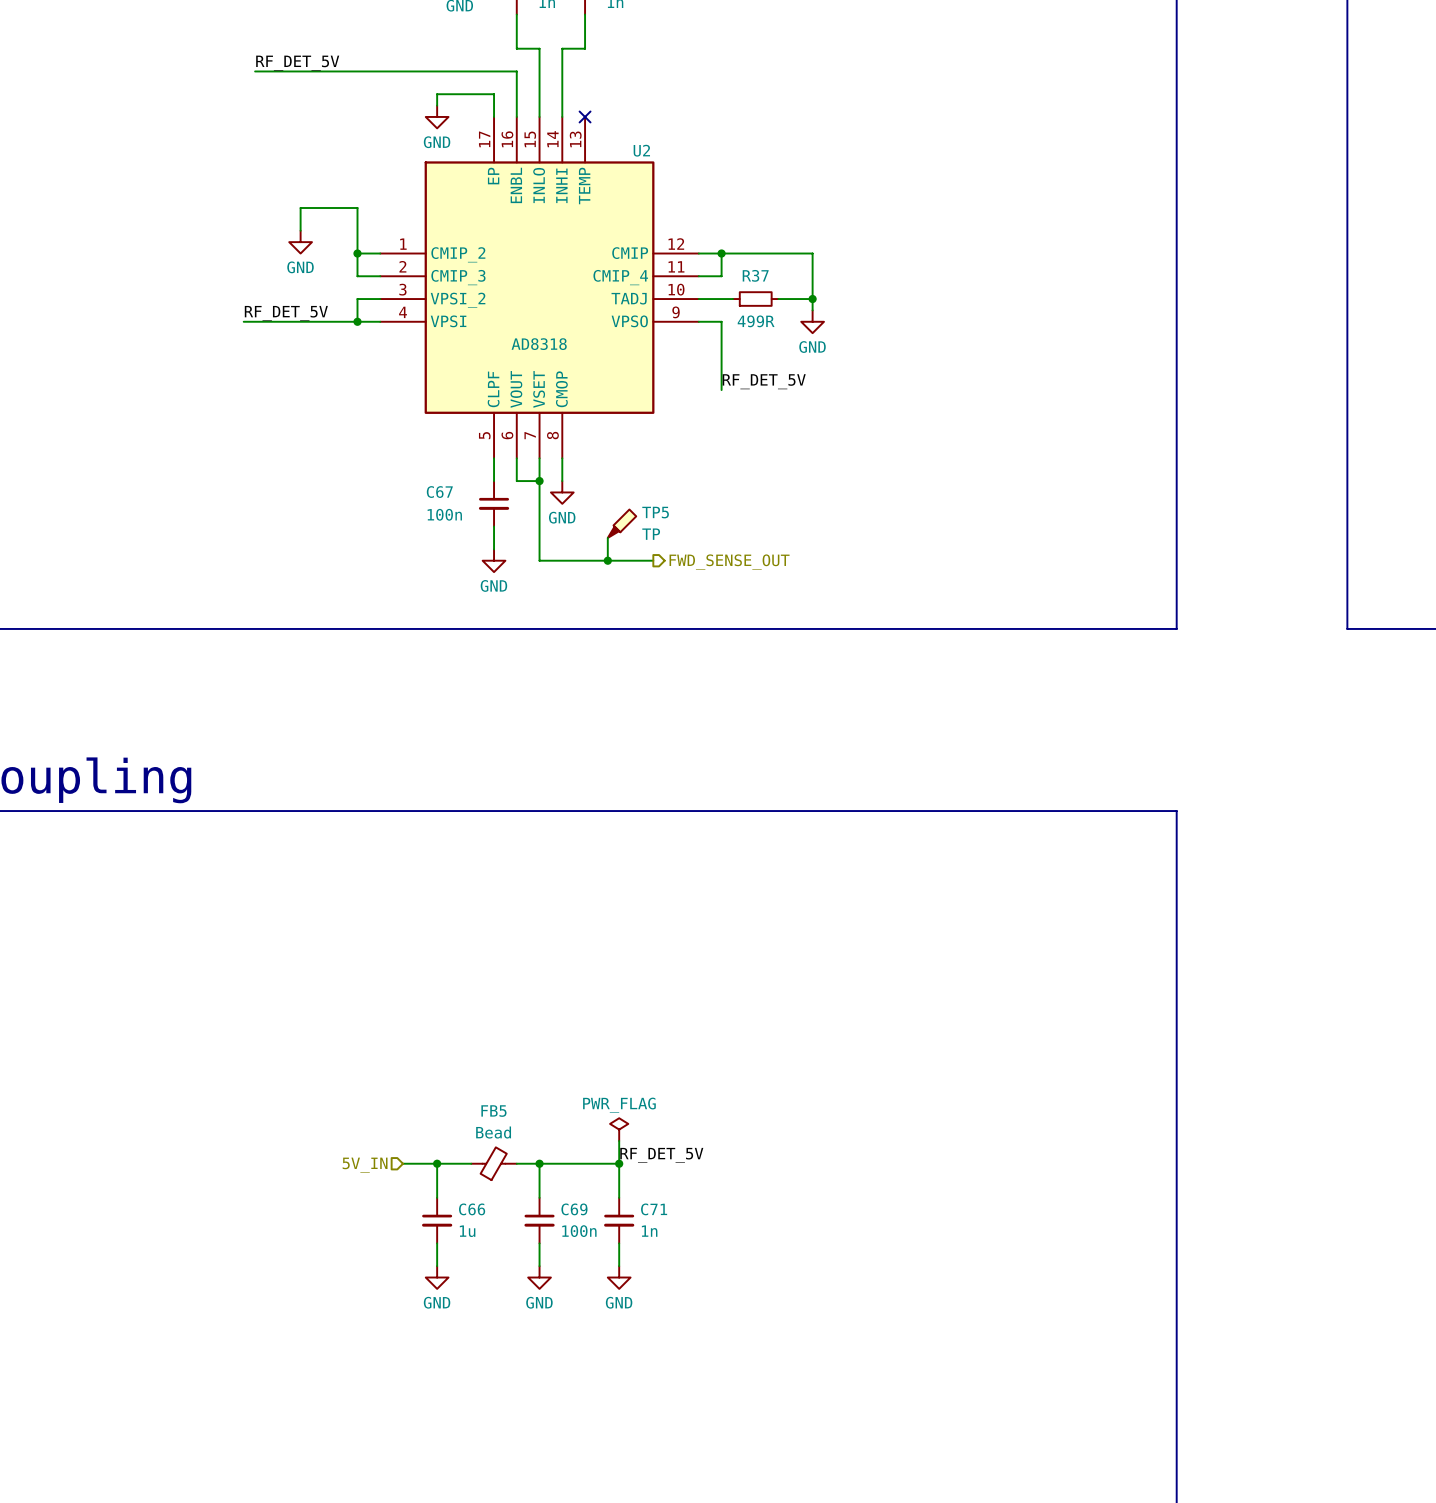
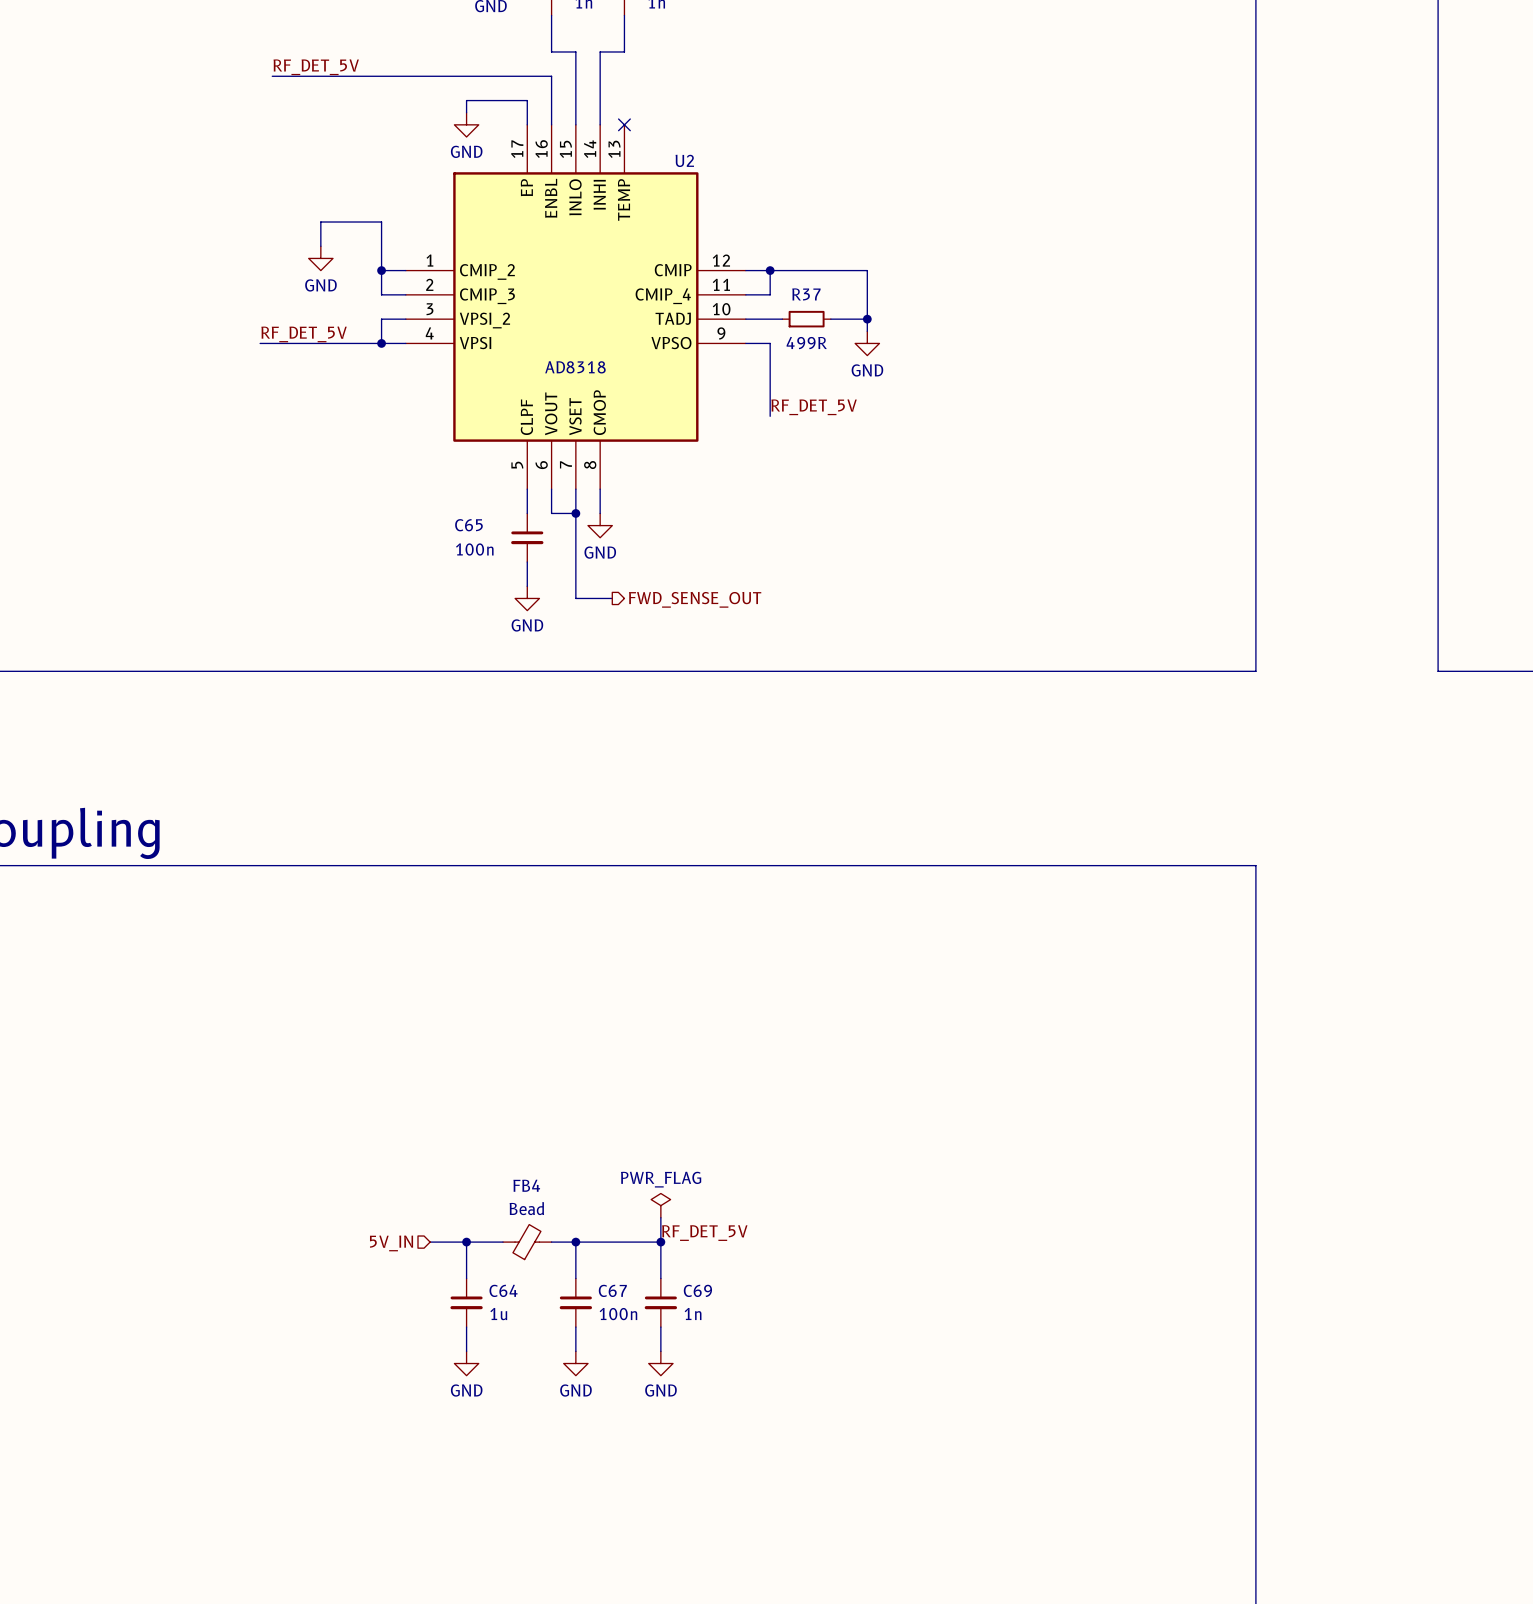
C67 name: C67 (439, 492) -> C65 (468, 525)
TP5: TP (622, 523) -> none
wire: (607, 537) (607, 560) -> none
wire: (573, 560) (653, 560) -> none
junction: (607, 560) -> none
hierarchical label position: FWD_SENSE_OUT (729, 562) -> FWD_SENSE_OUT (695, 599)
FB5 name: FB5 (493, 1111) -> FB4 (526, 1185)
C66 name: C66 (472, 1209) -> C64 (503, 1290)
C69 name: C69 (574, 1209) -> C67 (612, 1290)
C71 name: C71 (654, 1209) -> C69 (697, 1290)

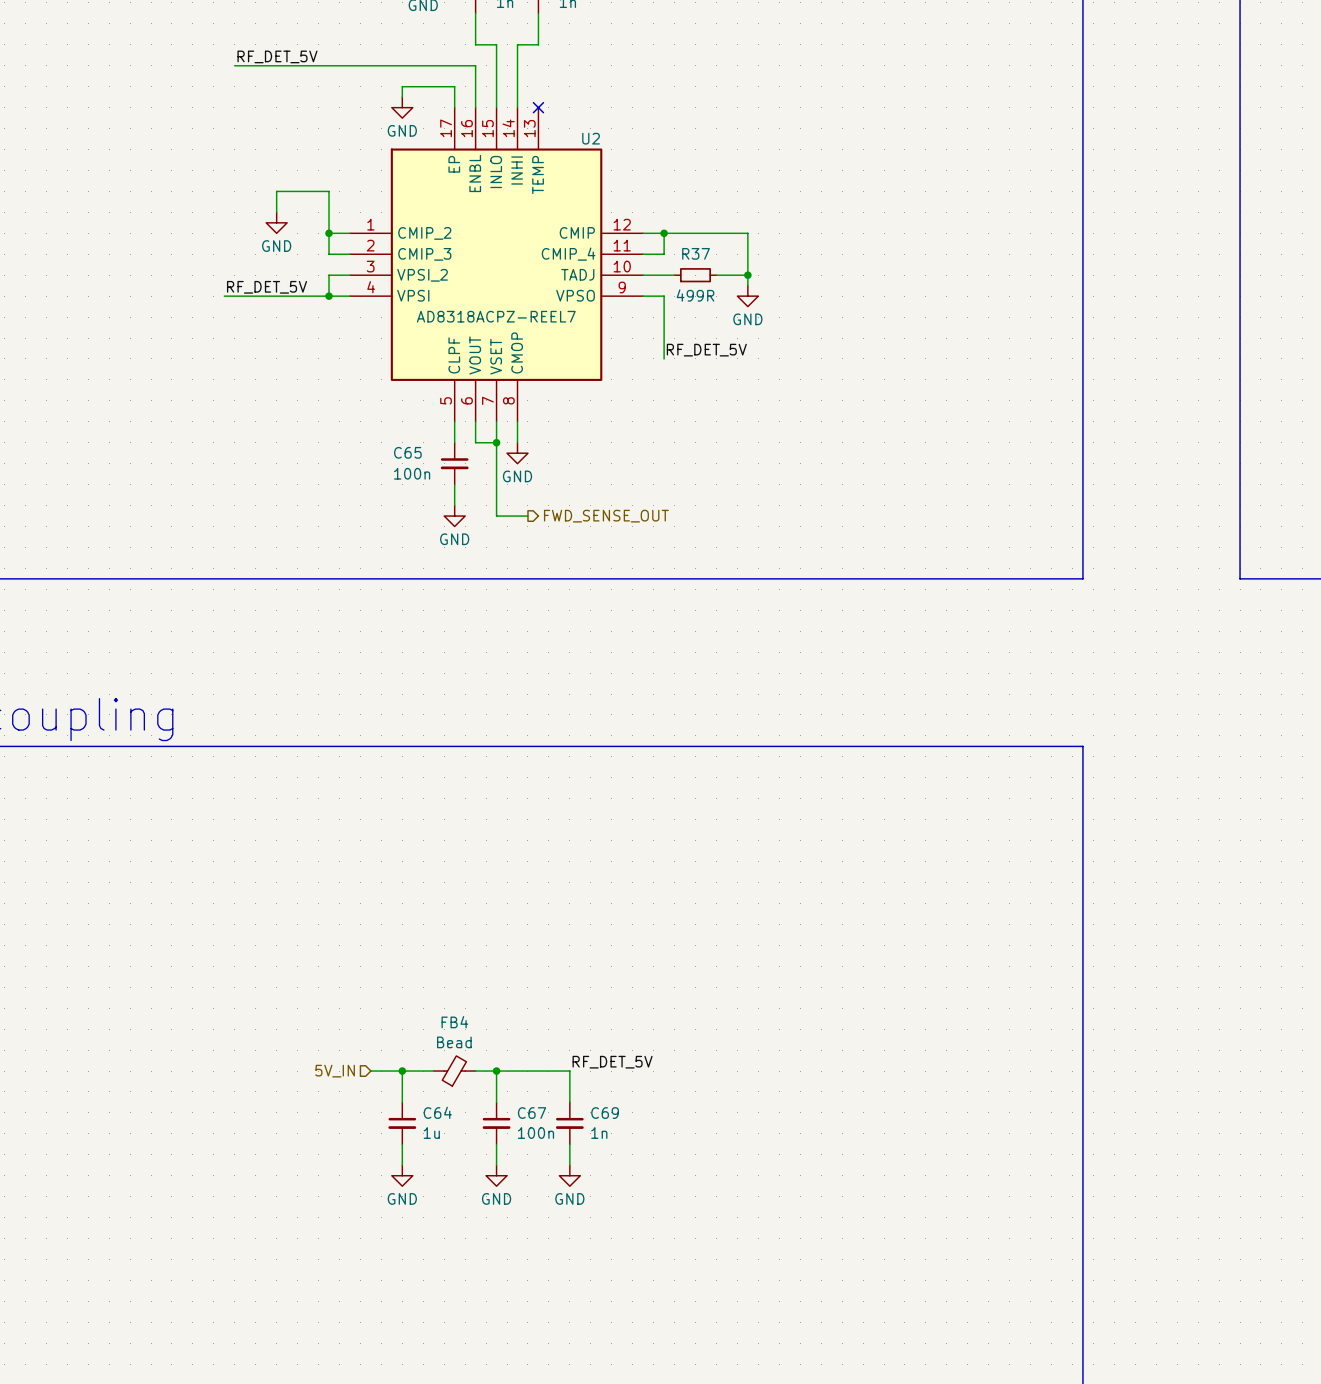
U2 value: AD8318 (575, 367) -> AD8318ACPZ-REEL7 (496, 316)
power symbol: PWR_FLAG (660, 1205) -> none
wire: (660, 1217) (660, 1242) -> none
junction: (660, 1242) -> none

